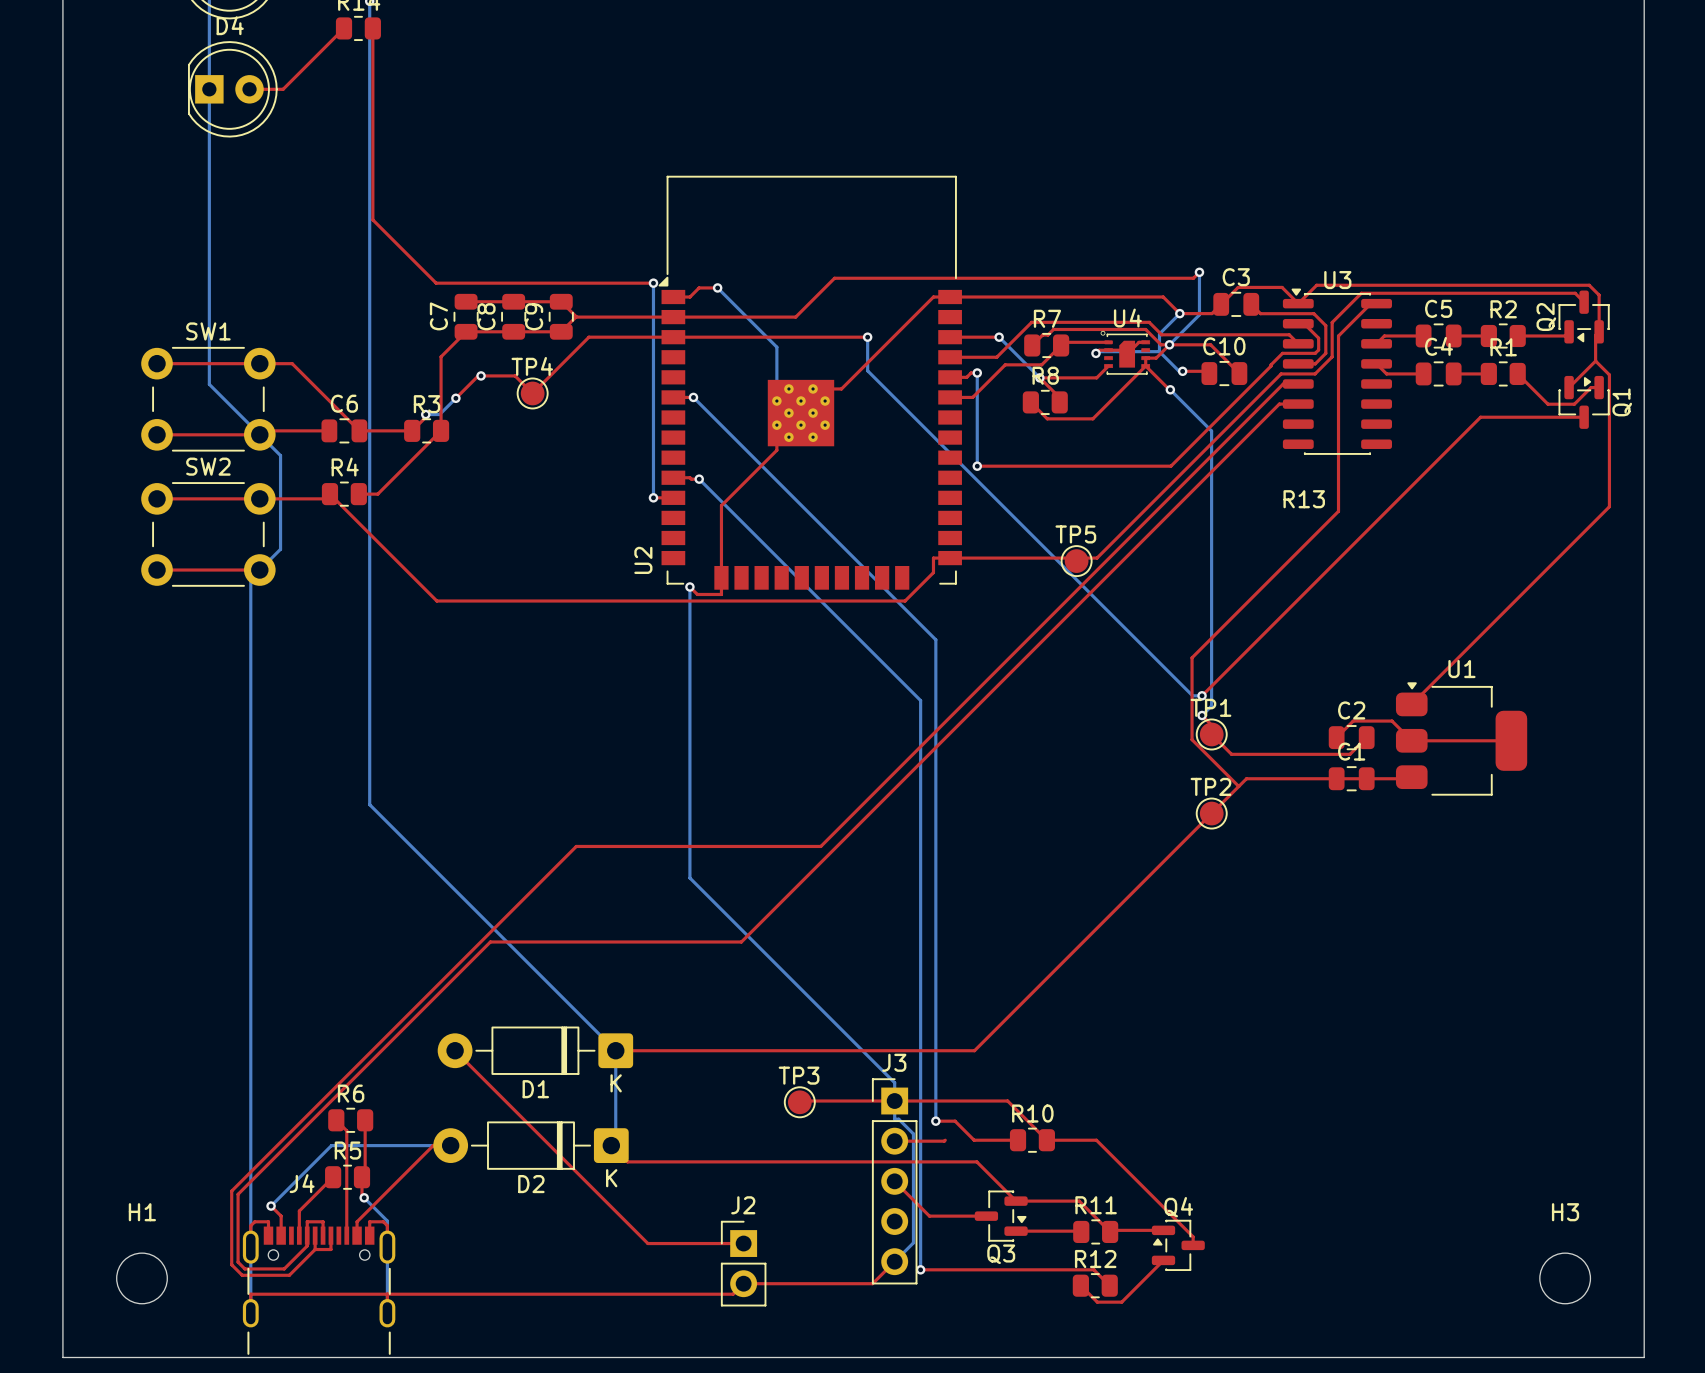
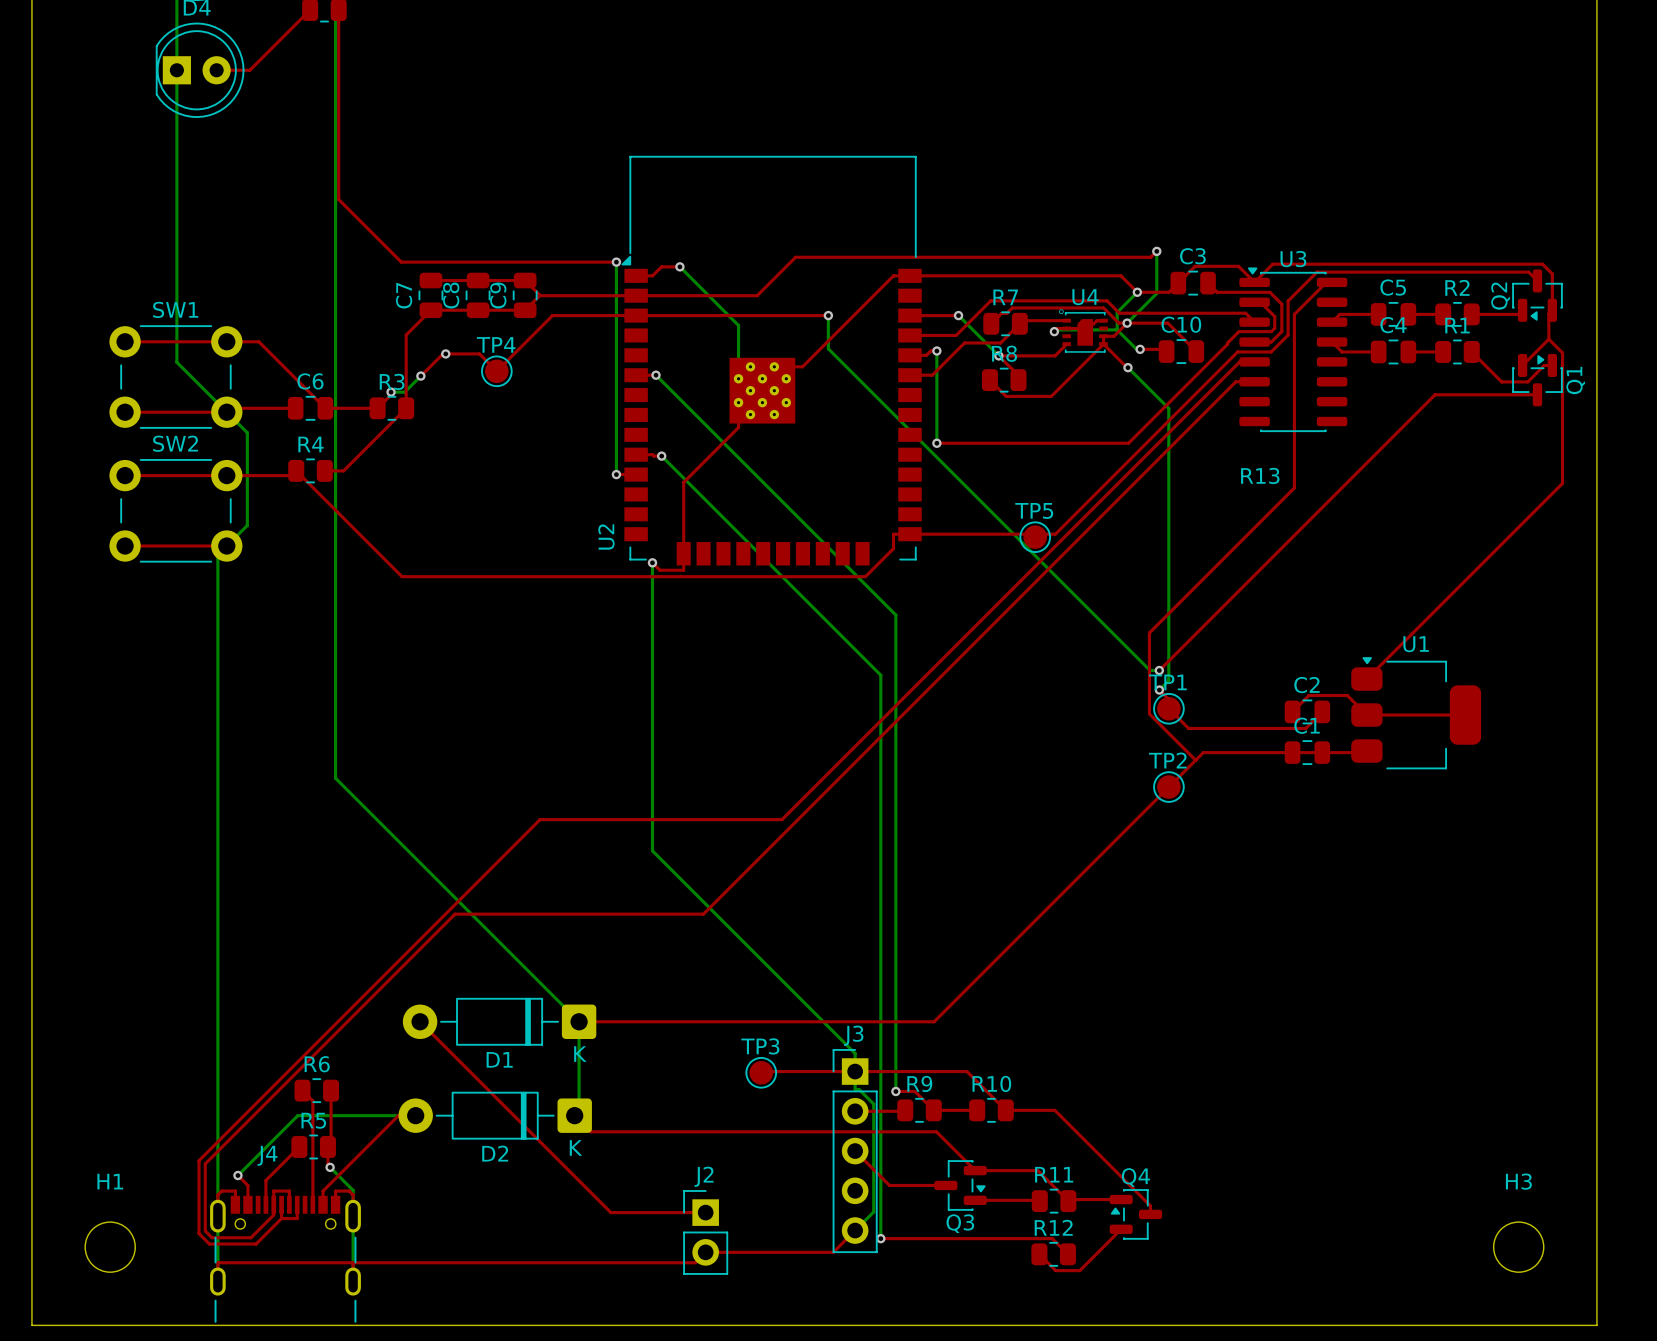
R9: none -> (919, 1110)

